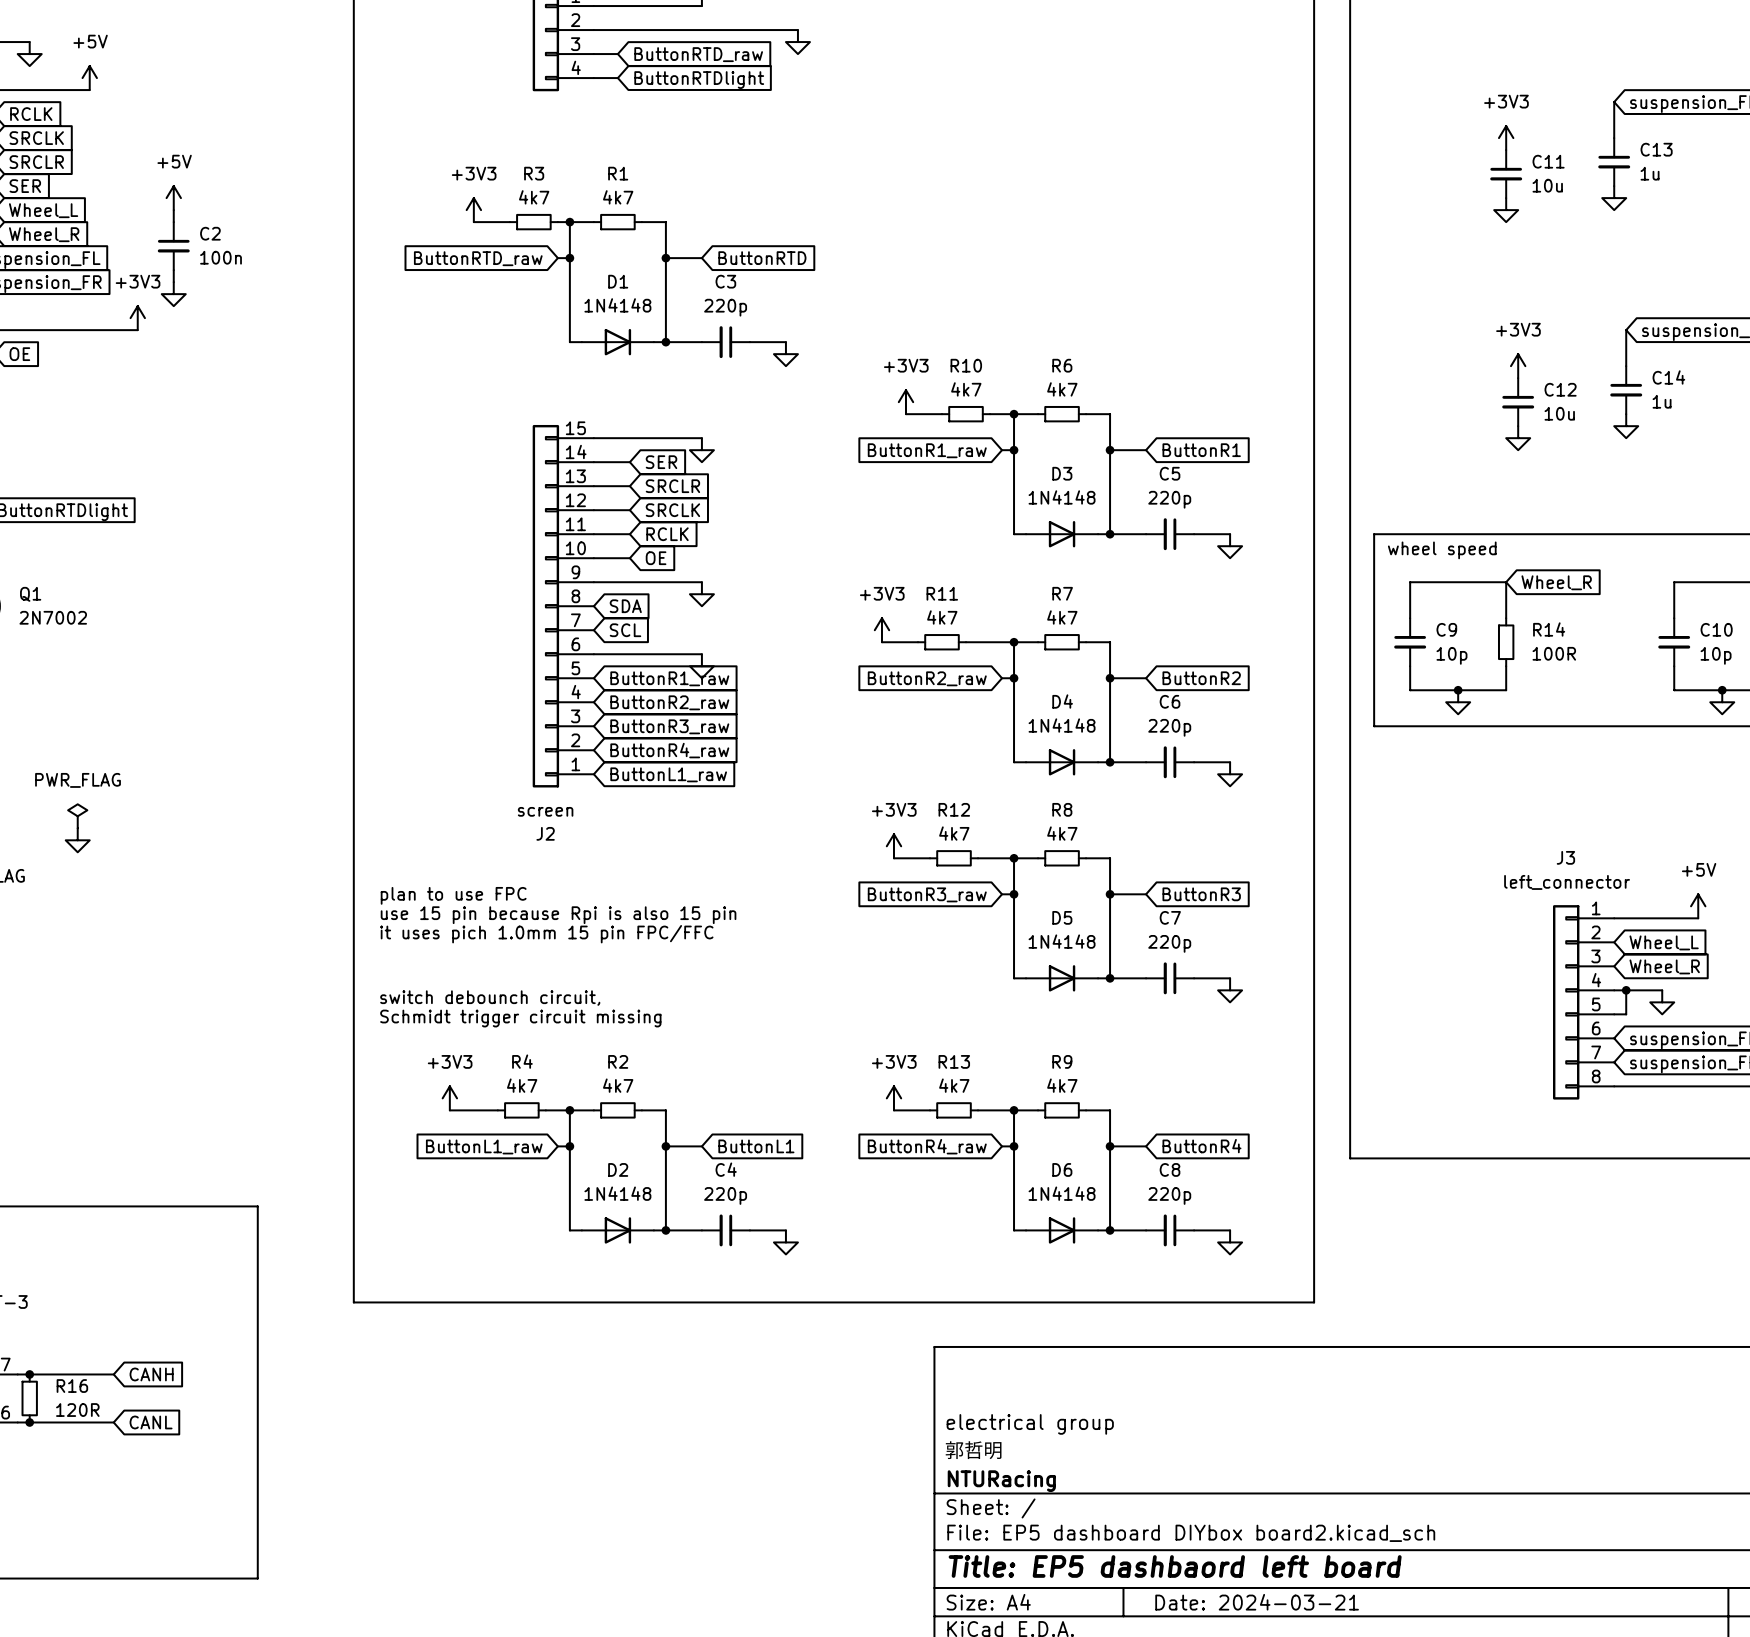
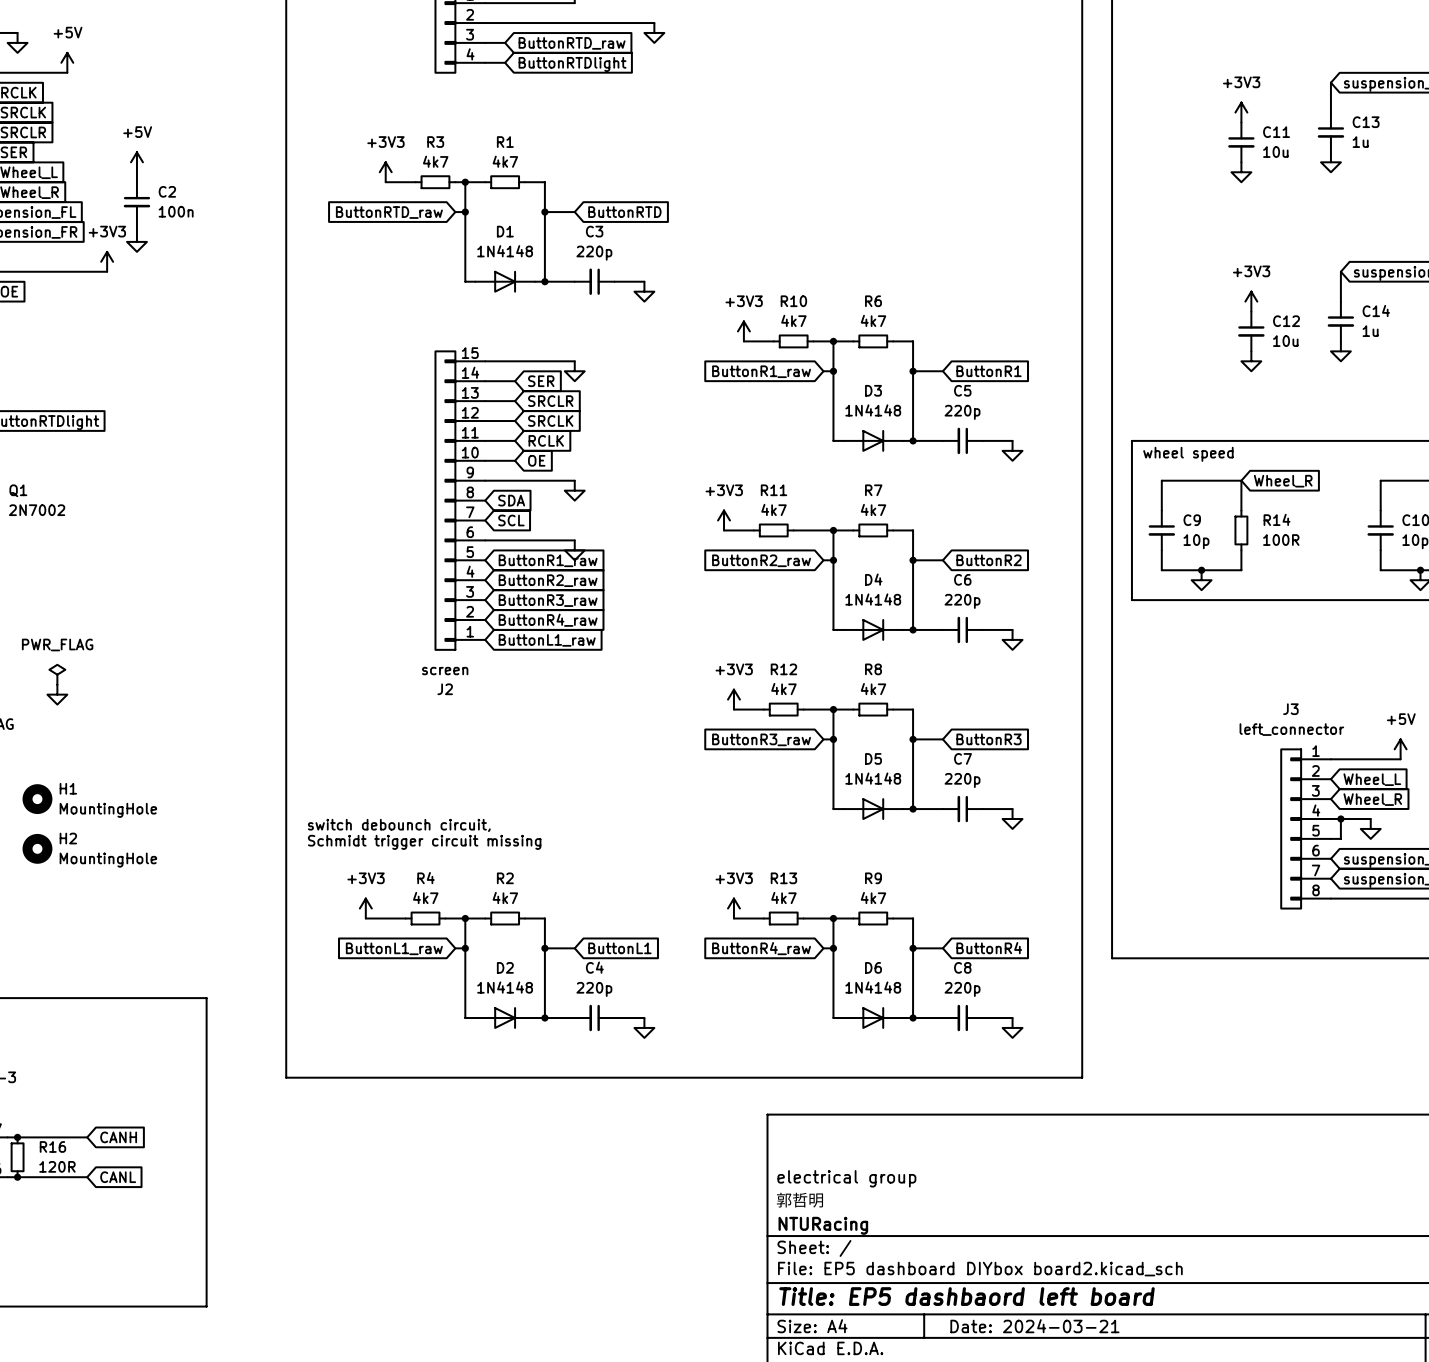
text: plan to use FPC (453, 895) -> none
text: use 15 pin because Rpi is also 15 pin (558, 915) -> none
text: it uses pich 1.0mm 15 pin FPC/FFC (546, 934) -> none
H1: none -> MountingHole (37, 799)
H2: none -> MountingHole (37, 848)

